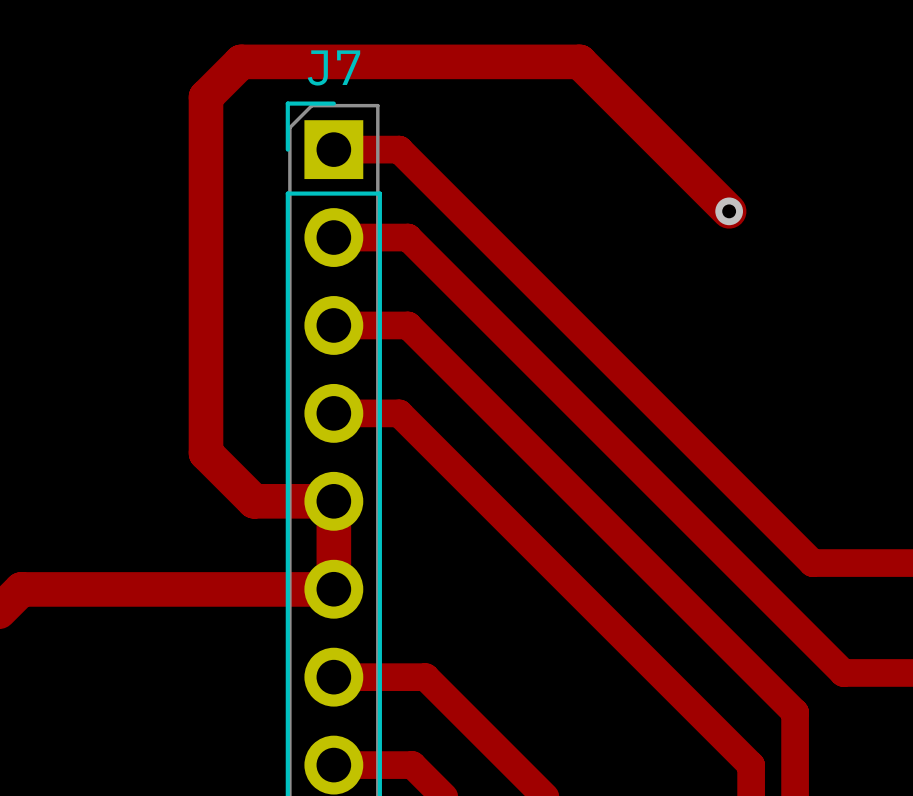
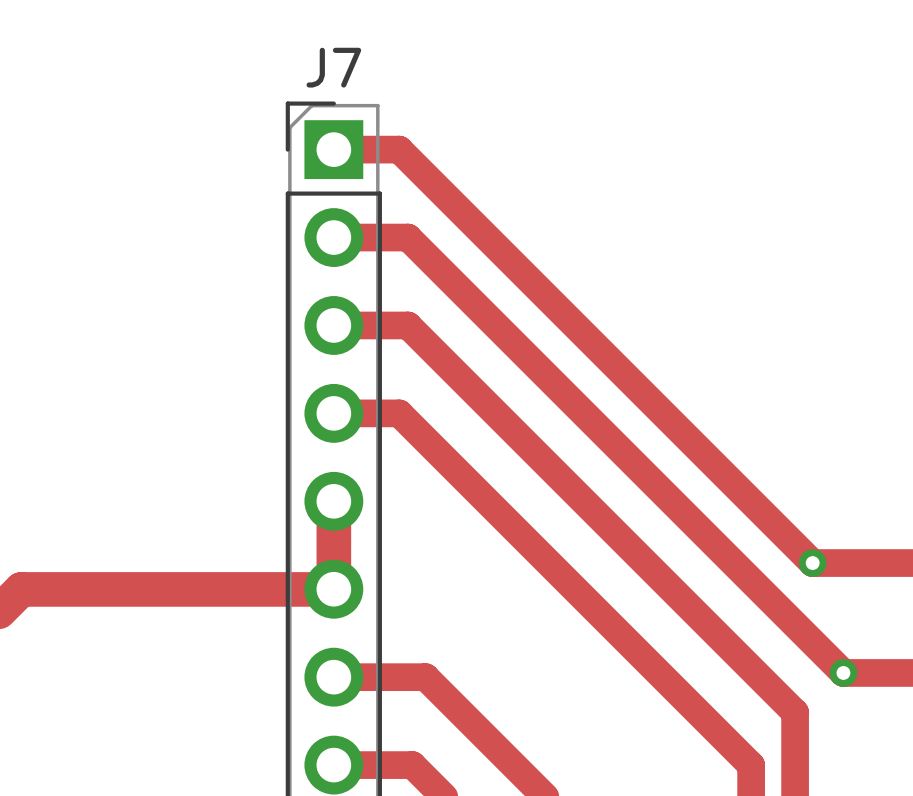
track: (729, 211) (579, 61) (241, 61) (206, 97) (206, 453) (254, 501) (333, 501) -> none
via: (729, 211) -> none
via: none -> (812, 563)
via: none -> (843, 672)

